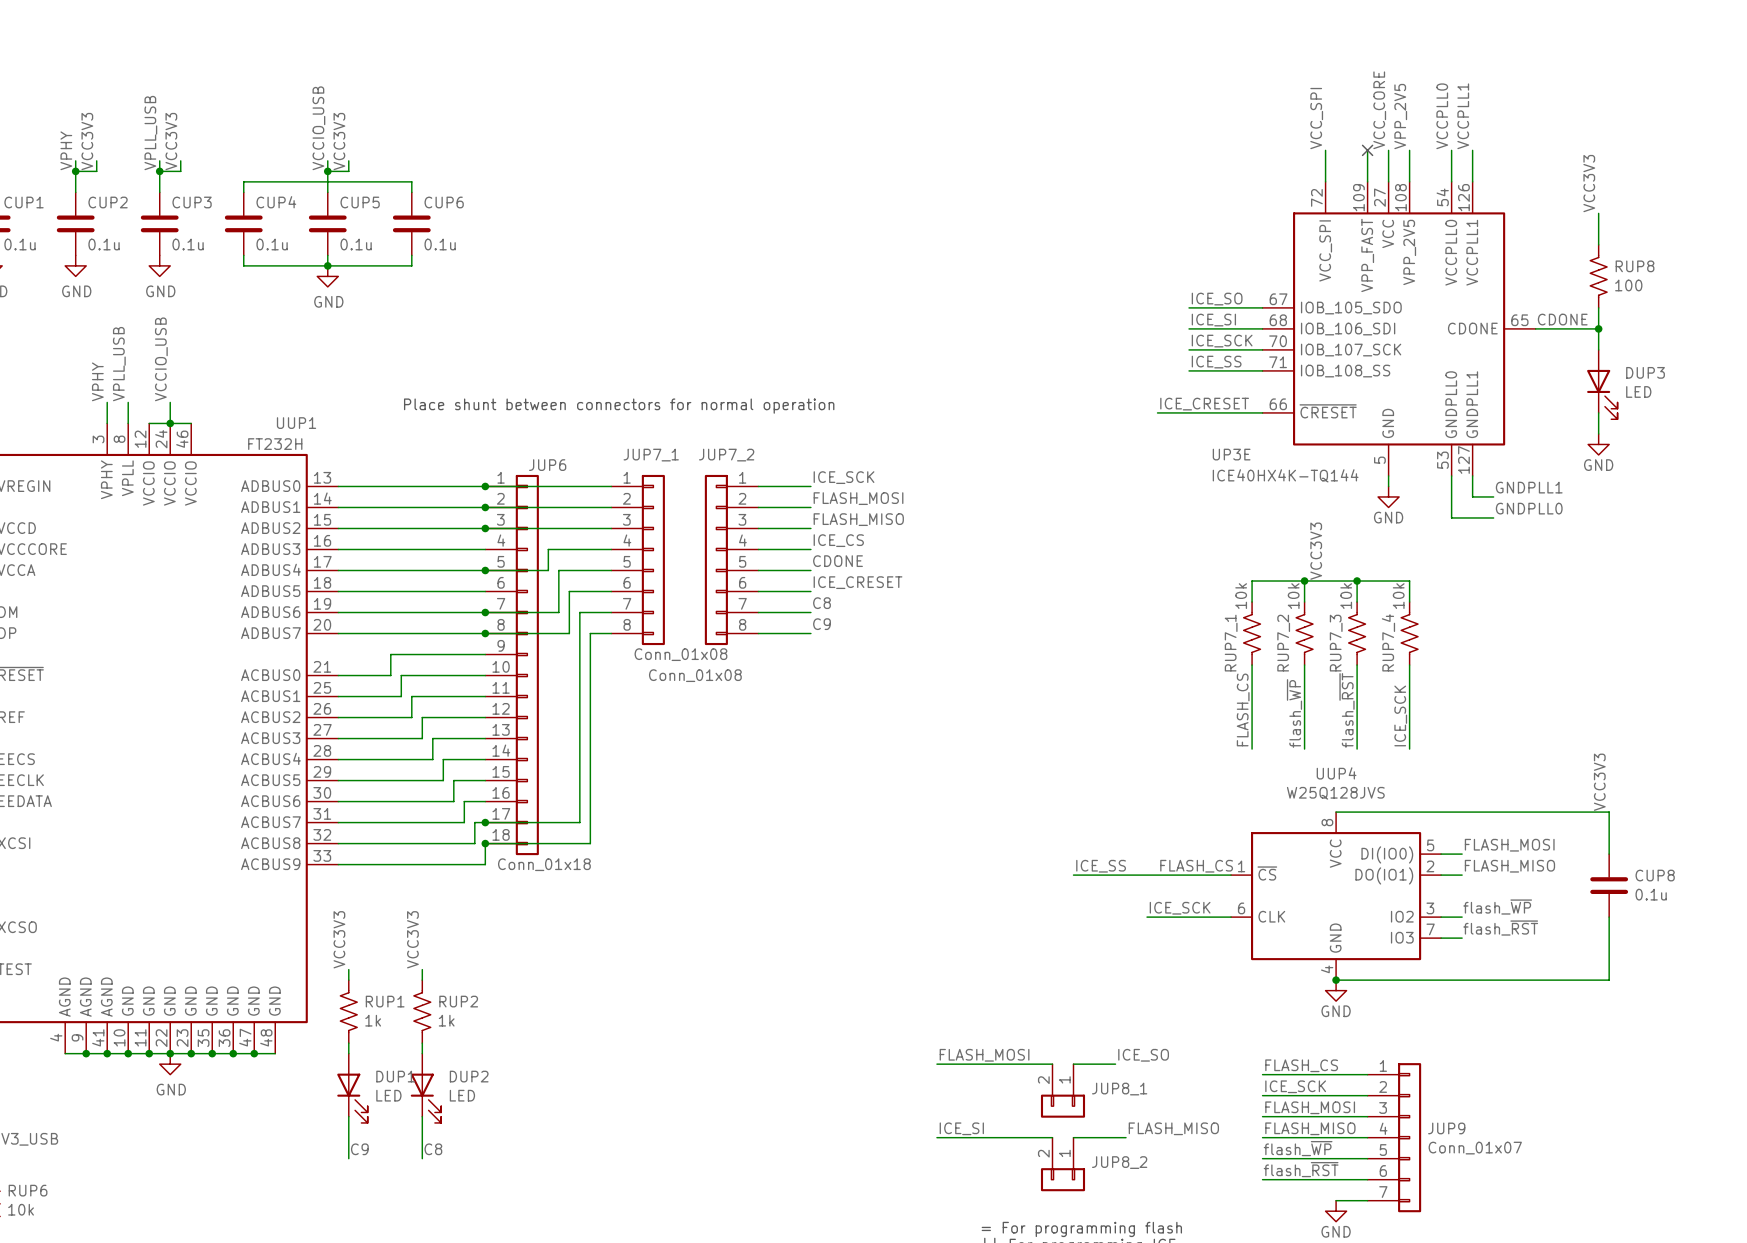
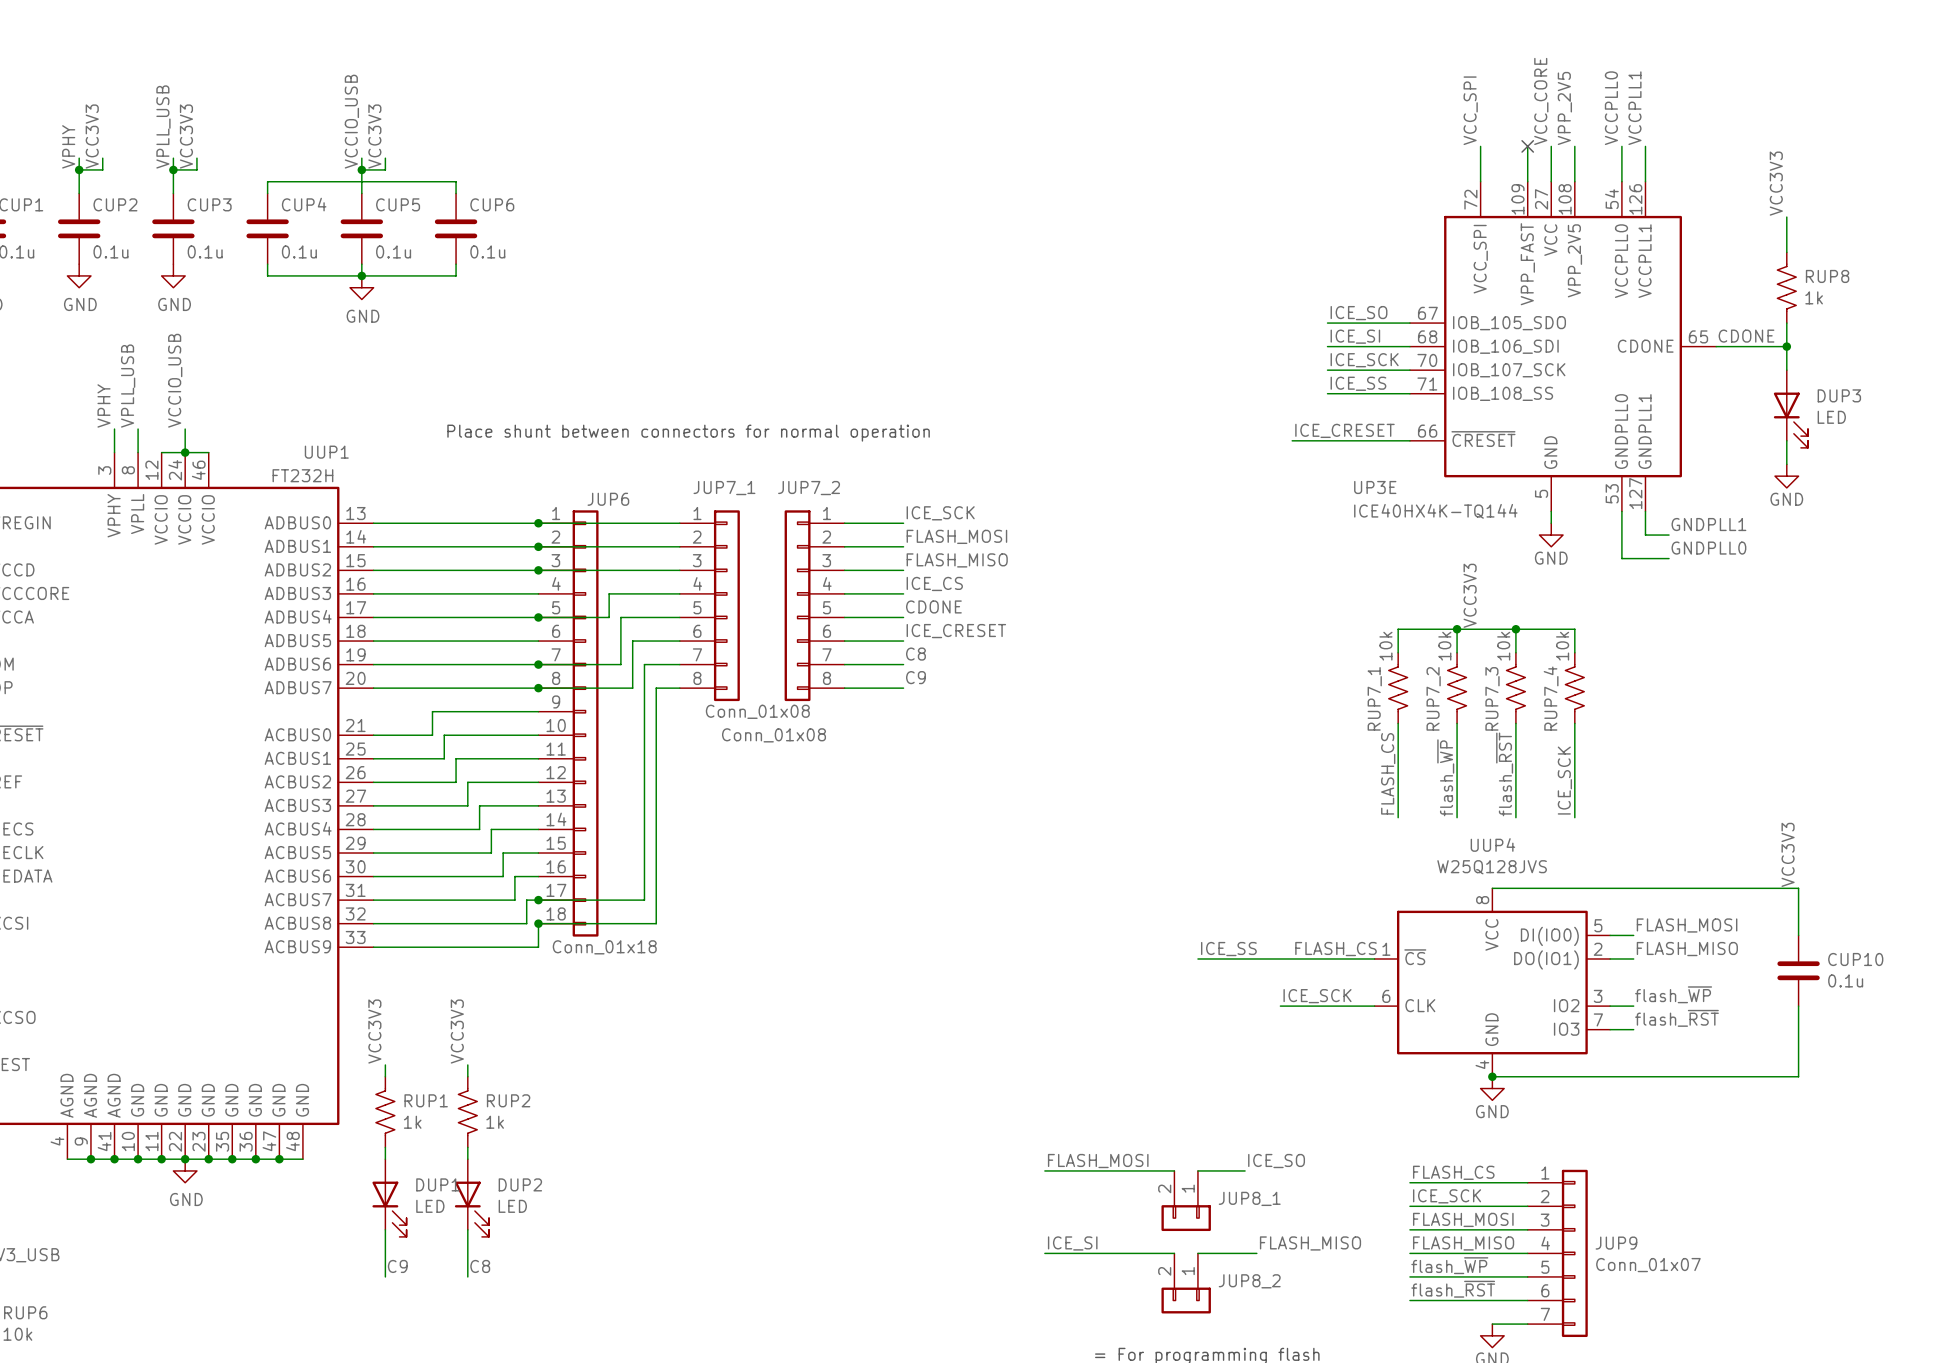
RUP8 value: 100 (1628, 285) -> 1k (1814, 297)
CUP8 name: CUP8 (1655, 875) -> CUP10 (1855, 959)

